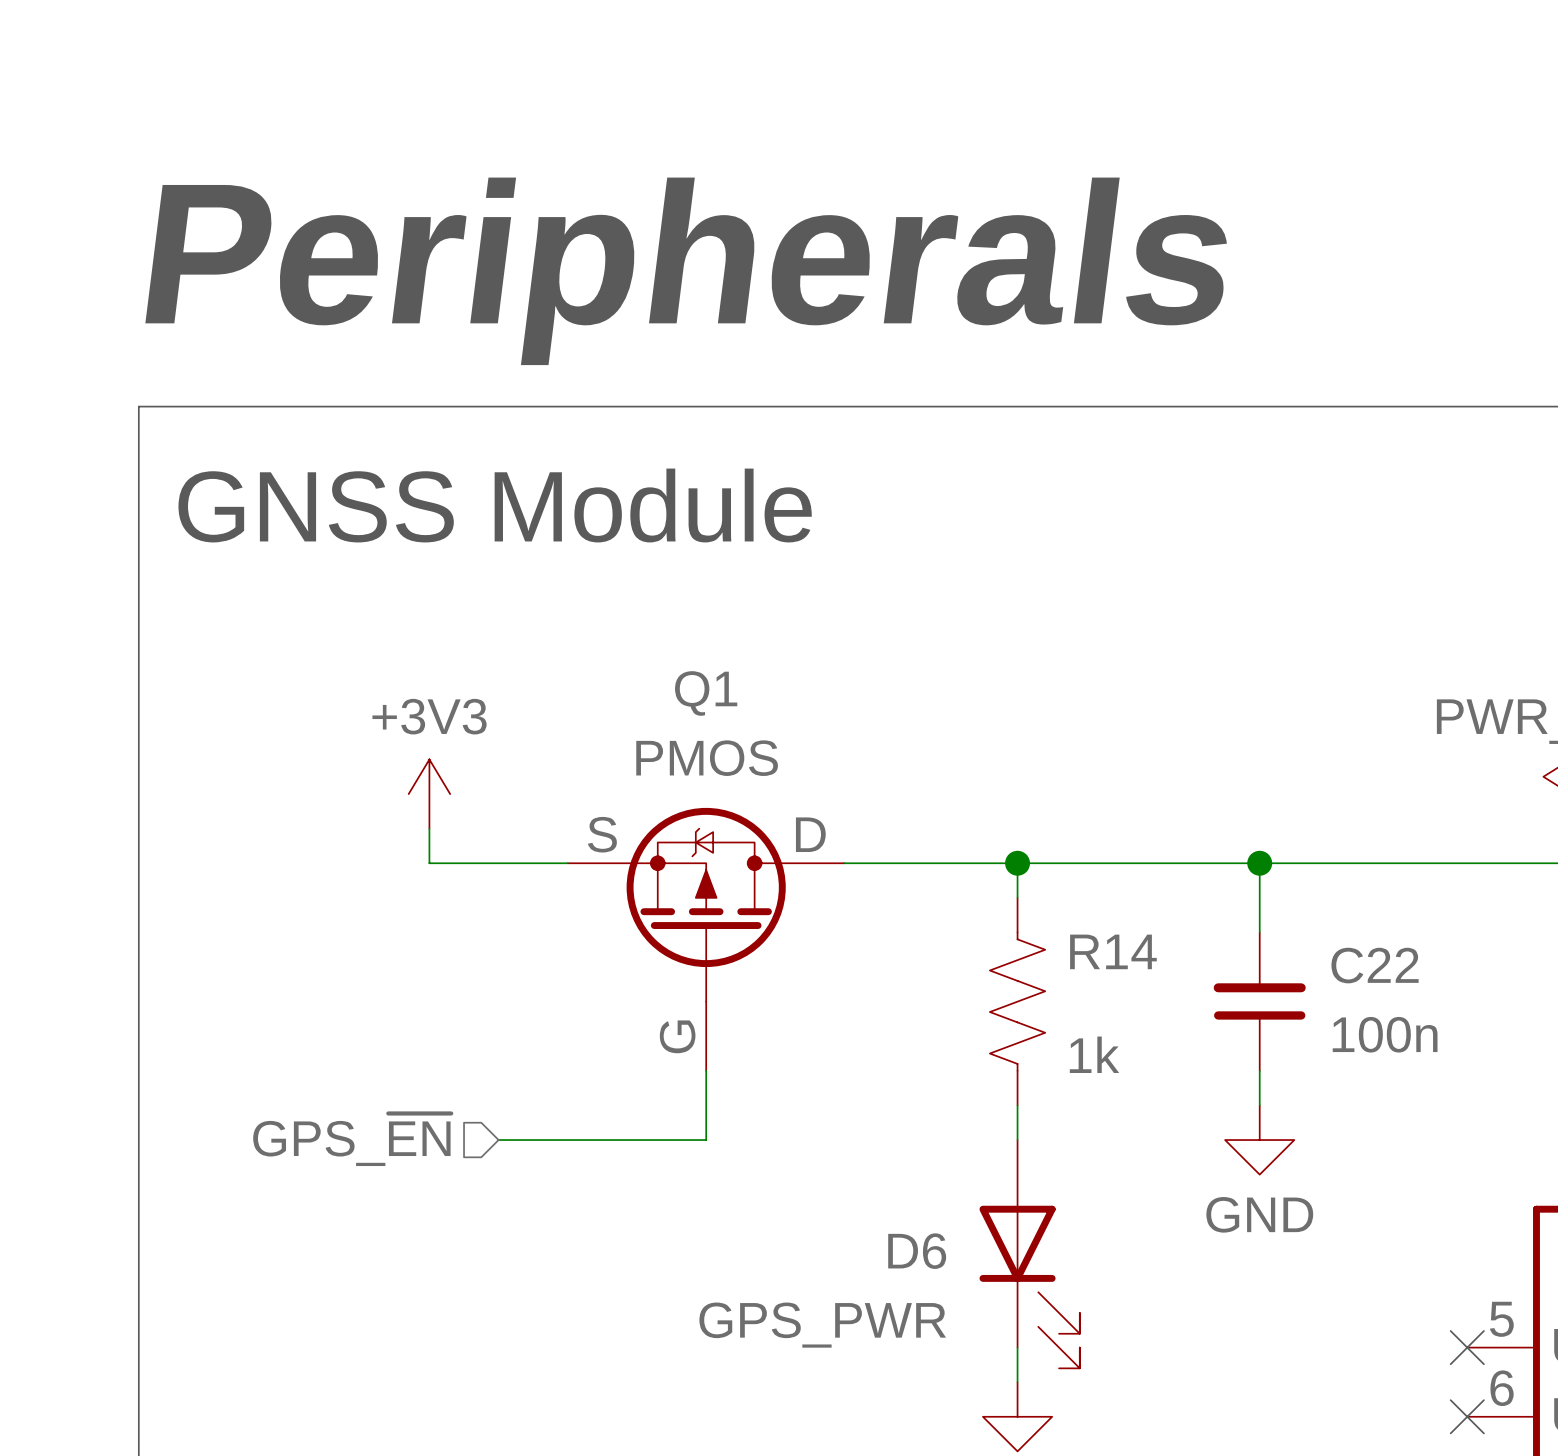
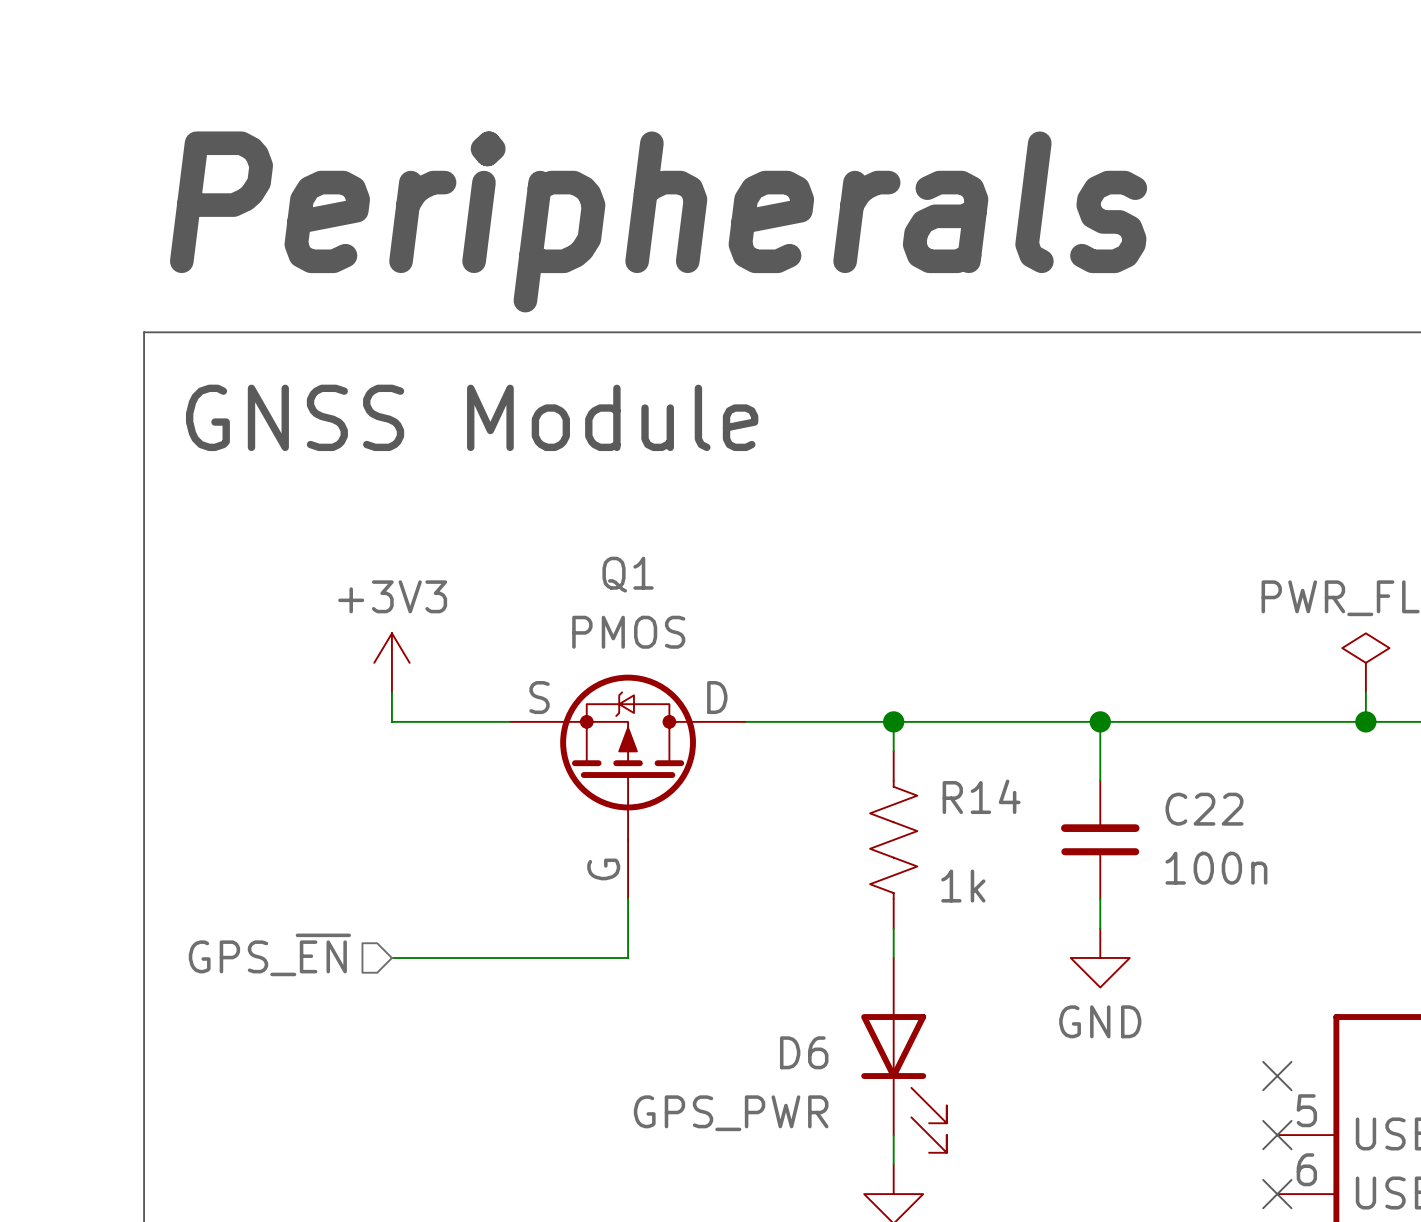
hierarchical label position: GPS_~{EN} (352, 1139) -> GPS_~{EN} (269, 954)
wire: none -> (391, 957) (450, 957)
no-connect mark: none -> (1277, 1076)

